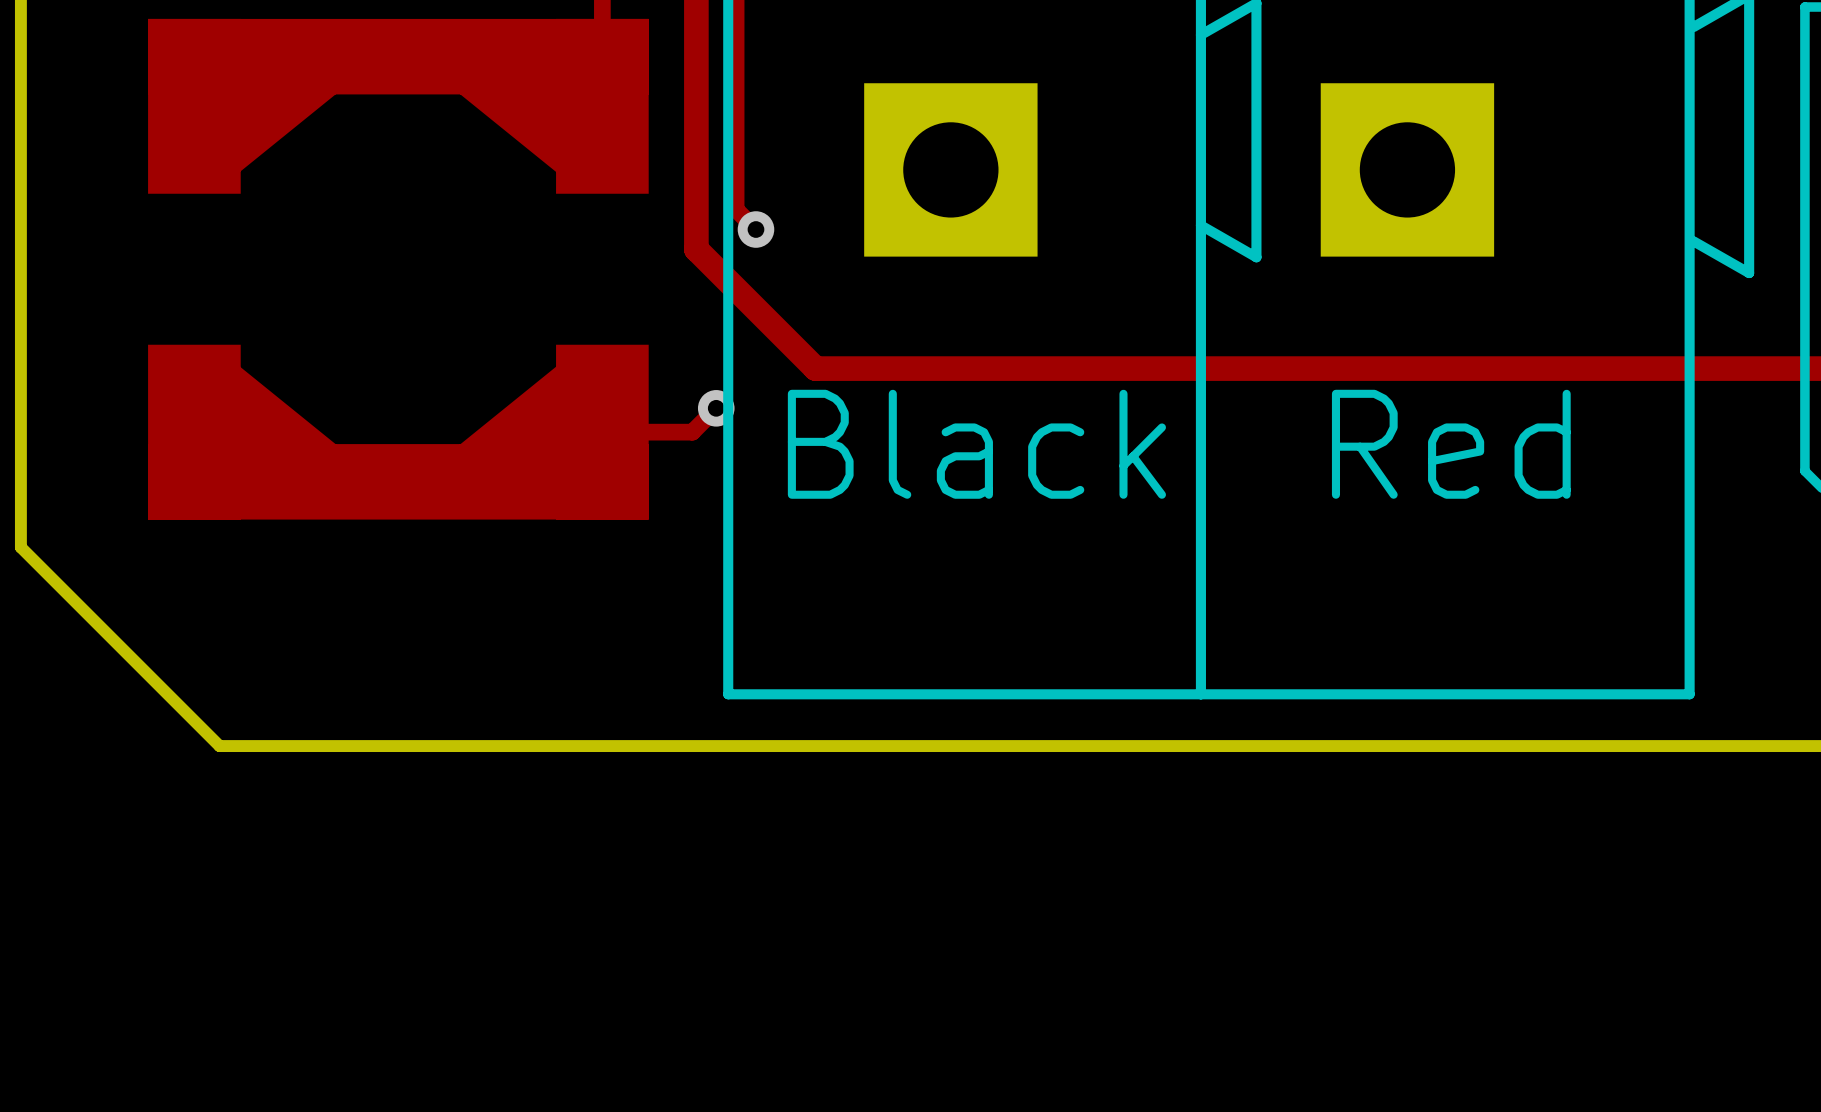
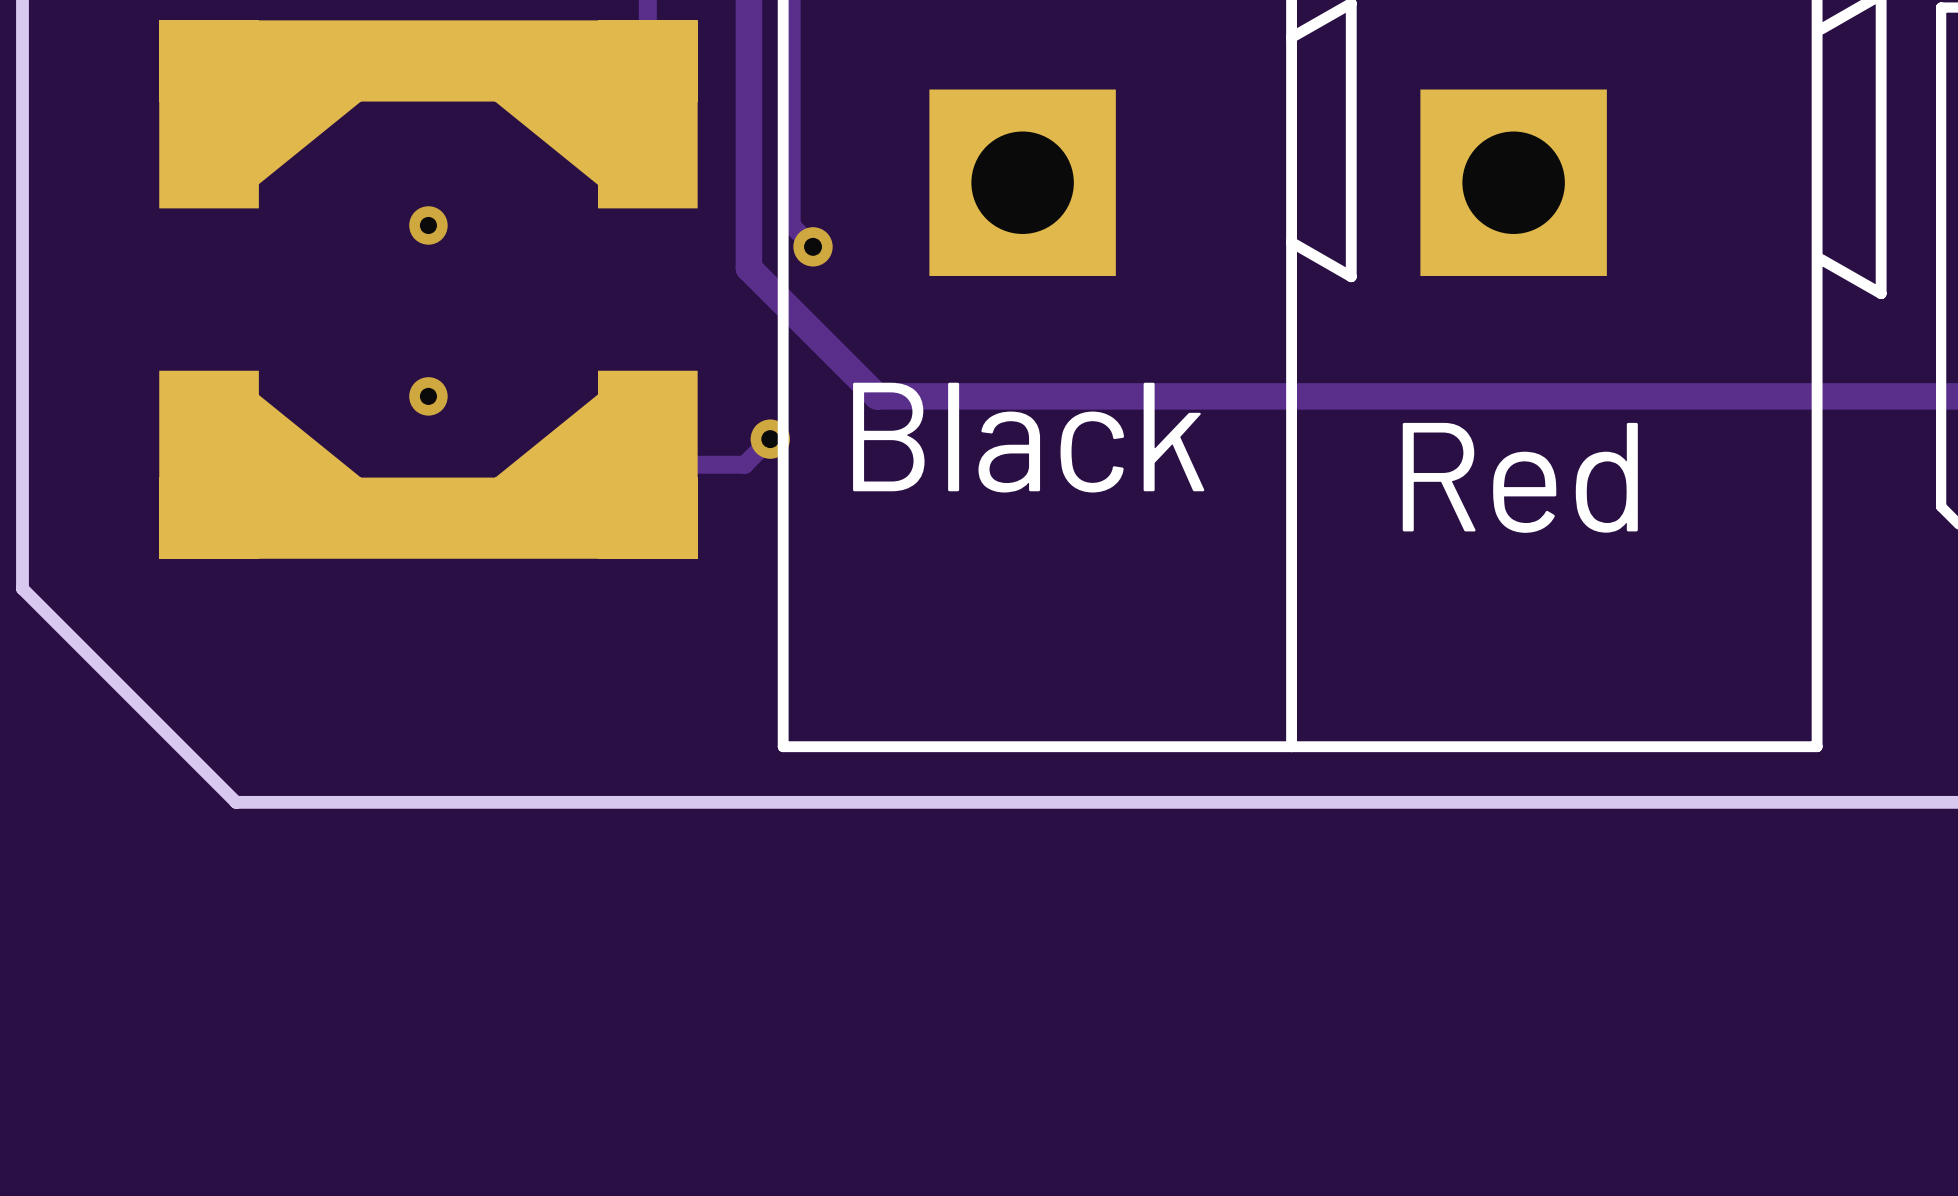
via: none -> (428, 225)
via: none -> (428, 396)
part text position: Black (976, 444) -> Black (1028, 437)
part text position: Red (1451, 444) -> Red (1520, 477)

